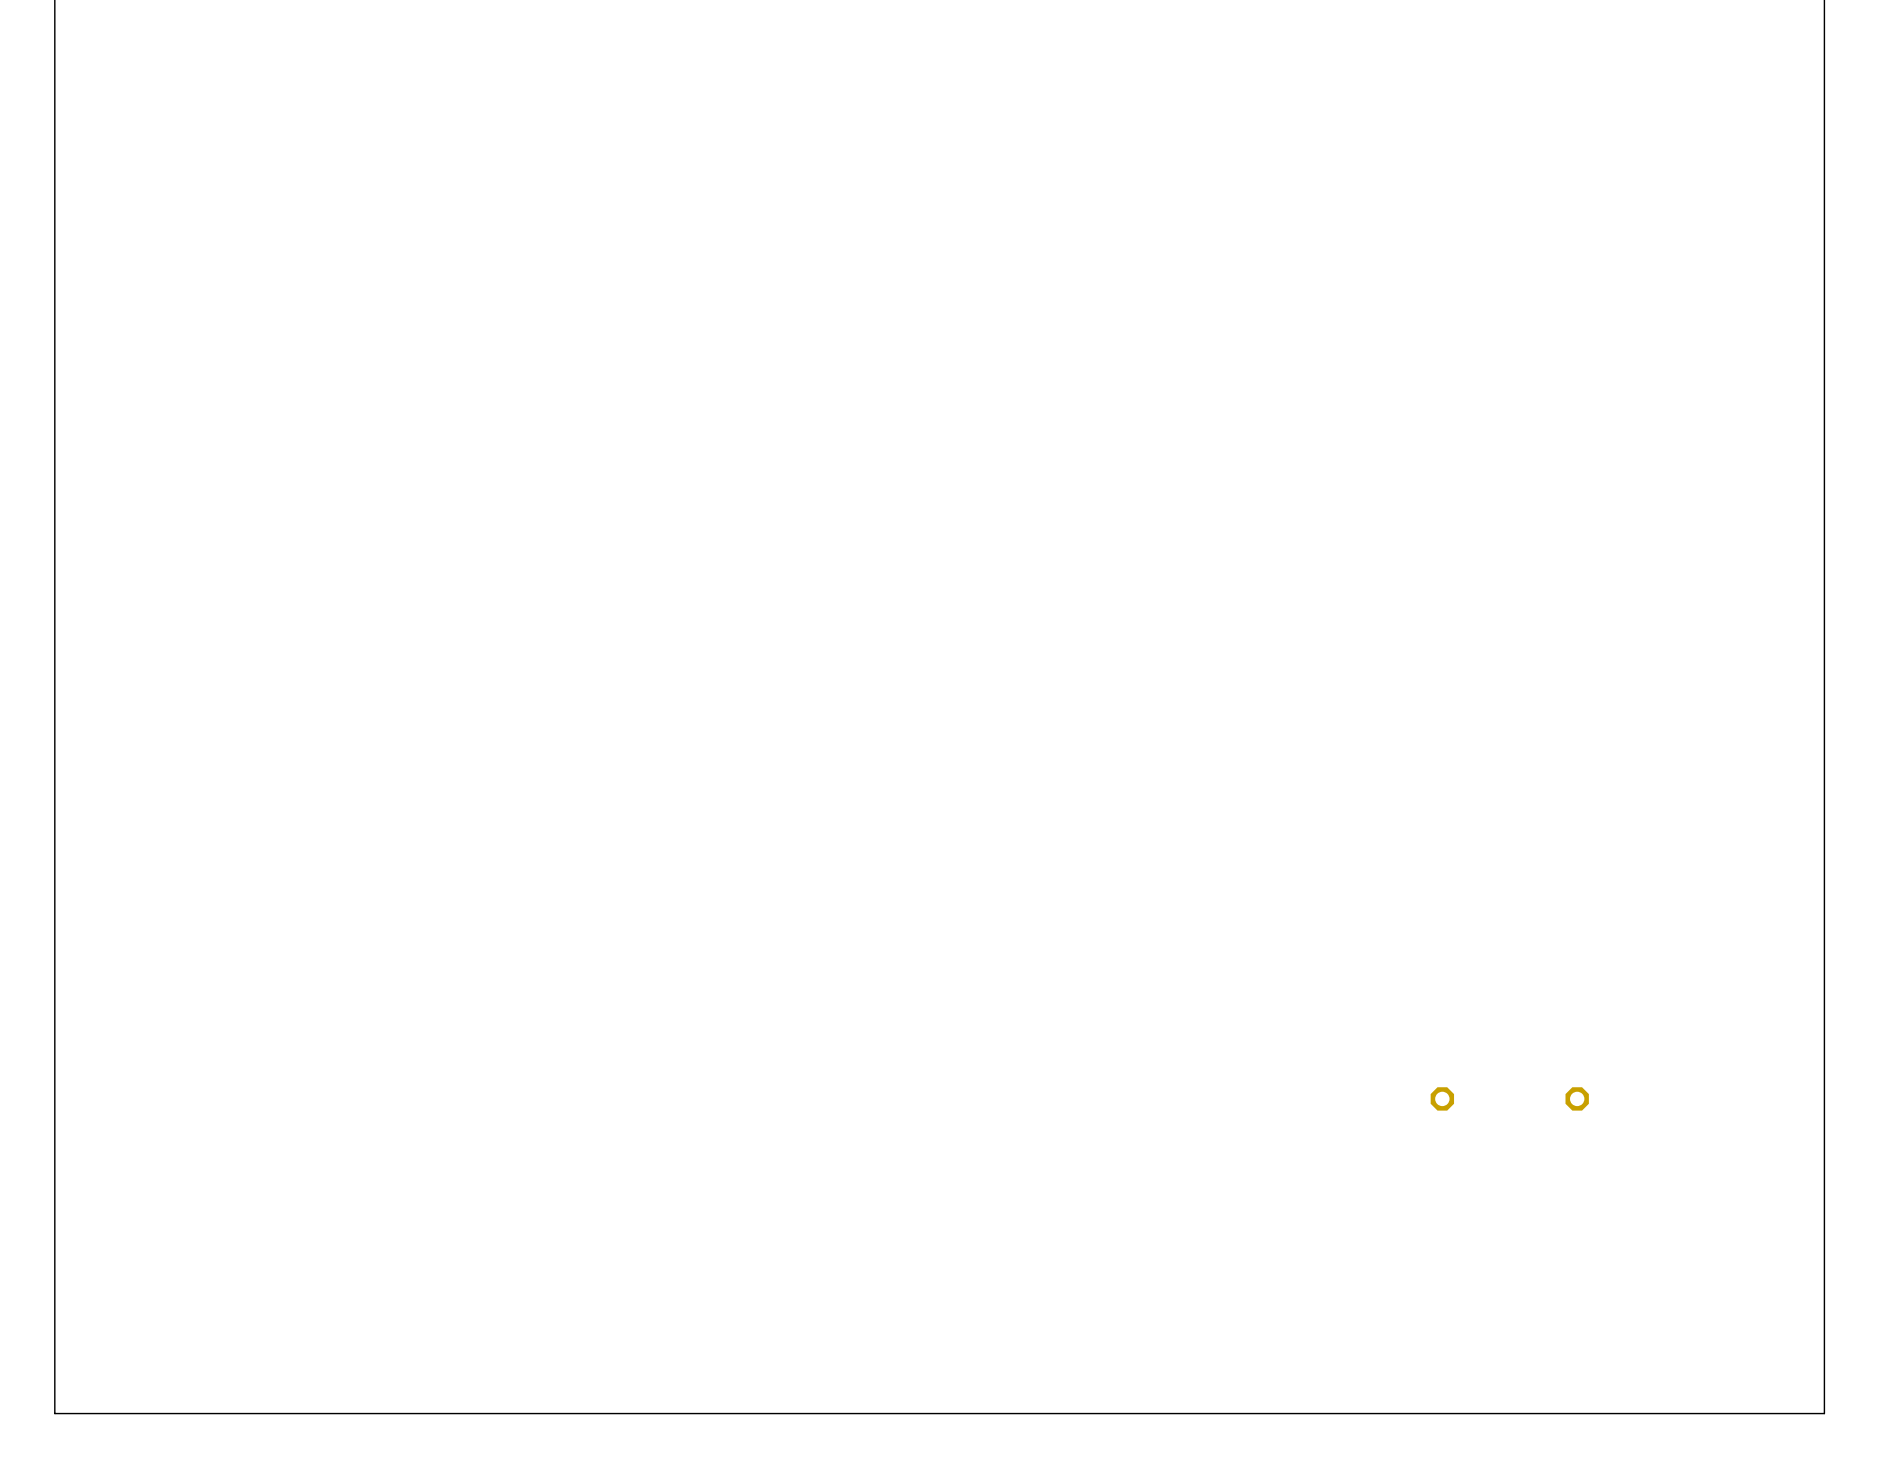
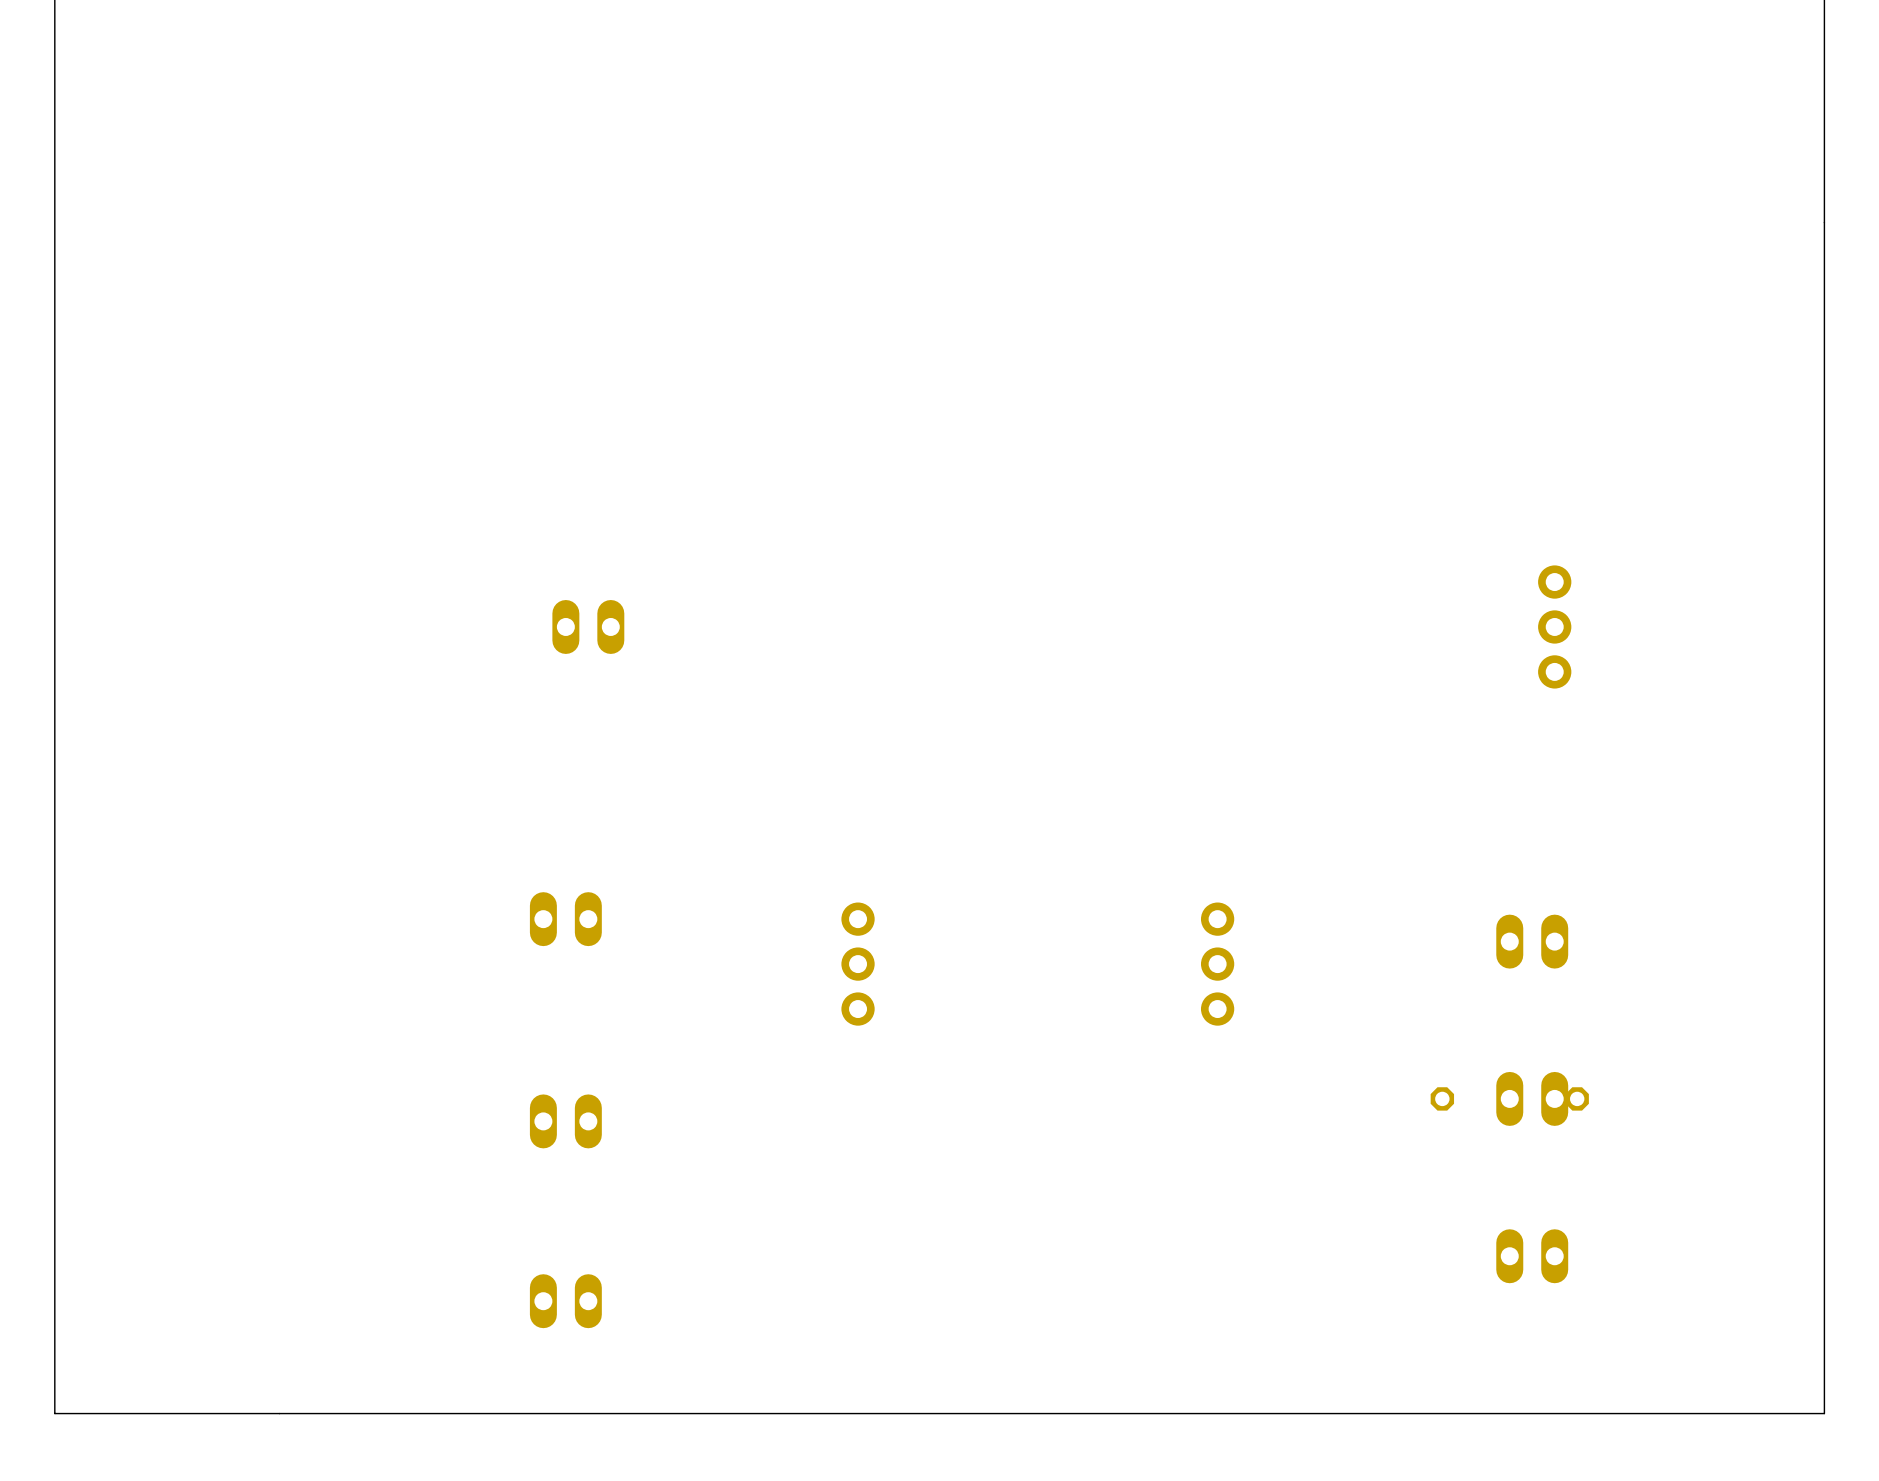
part: none -> (588, 626)
part: none -> (1554, 626)
part: none -> (565, 919)
part: none -> (1532, 941)
part: none -> (858, 964)
part: none -> (1217, 964)
part: none -> (1532, 1098)
part: none -> (565, 1121)
part: none -> (1532, 1256)
part: none -> (565, 1301)

